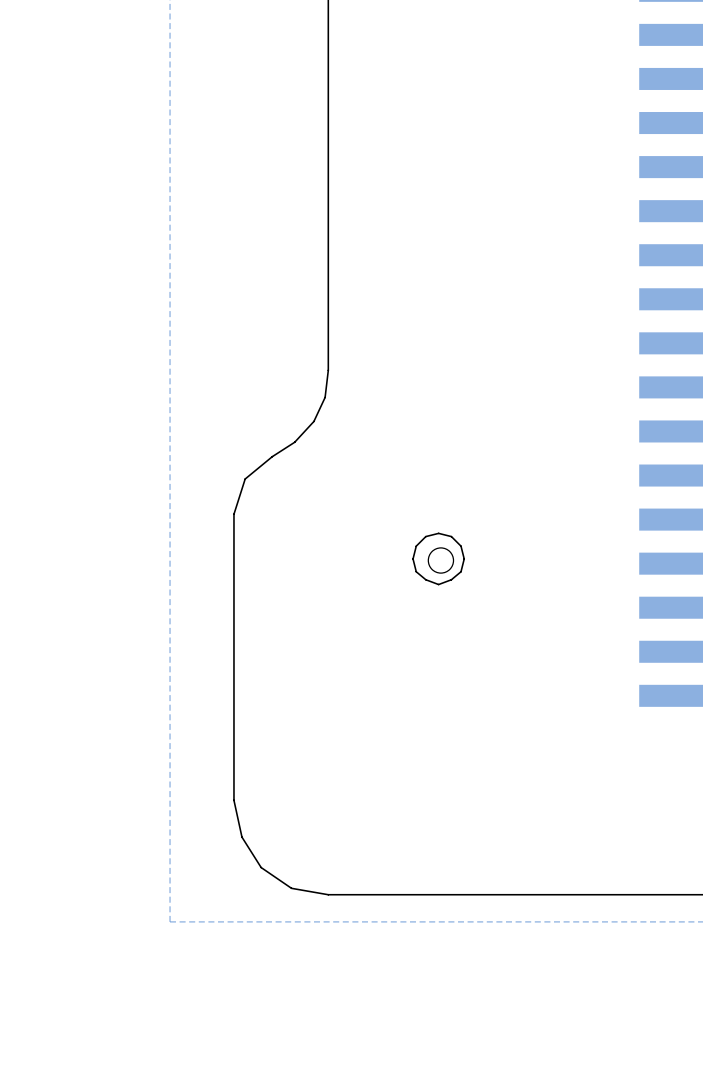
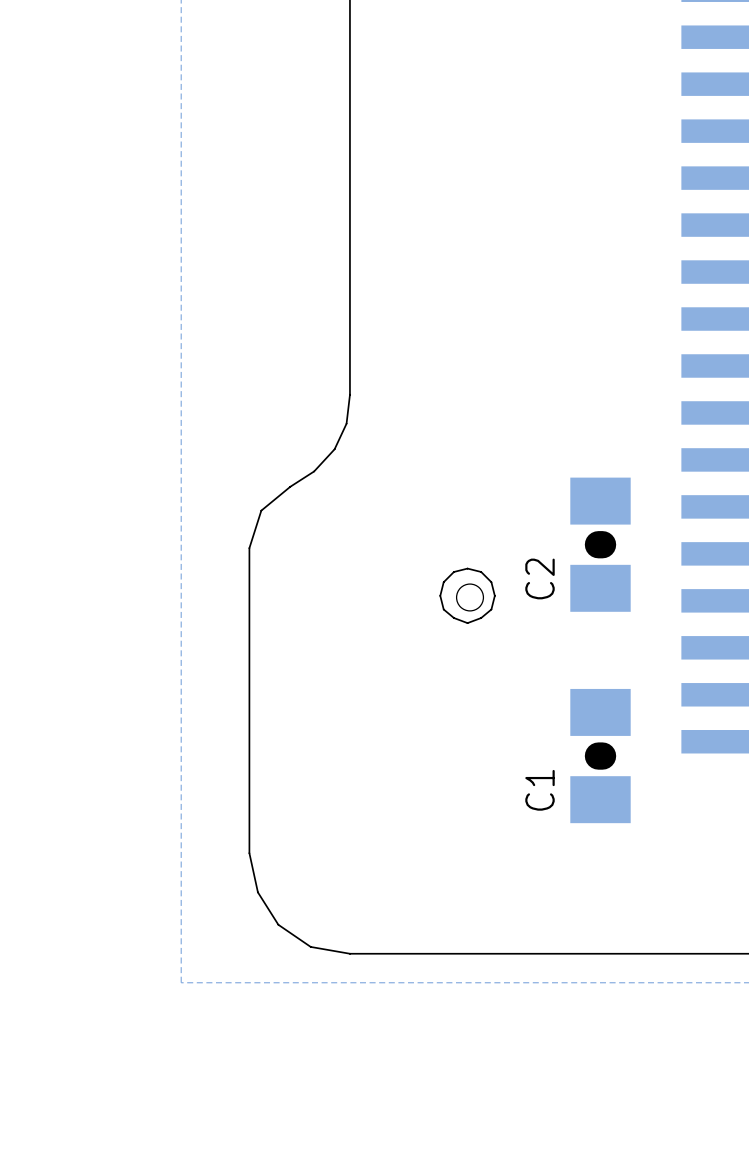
C2: none -> (600, 544)
C1: none -> (600, 756)

